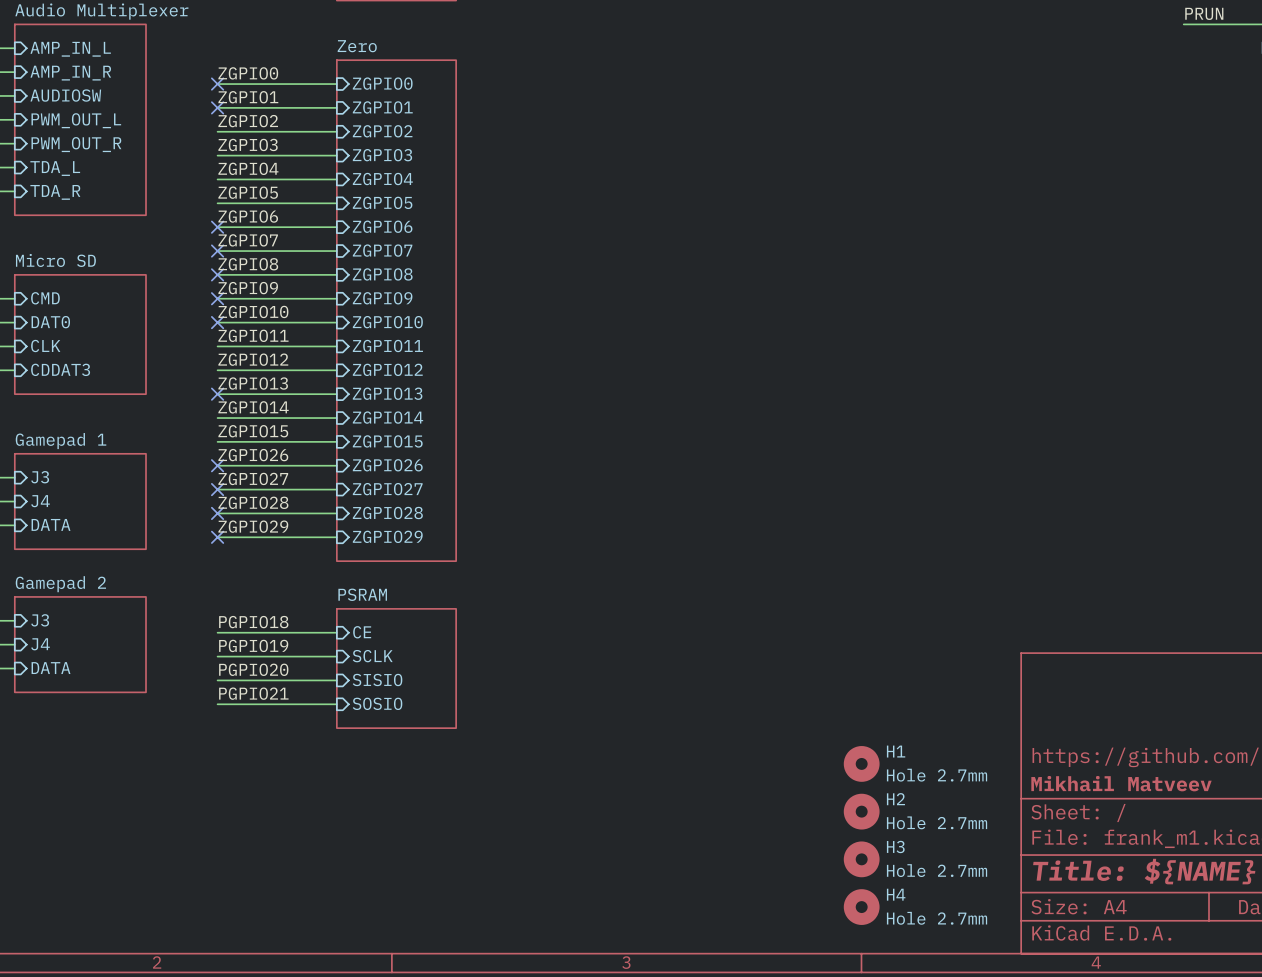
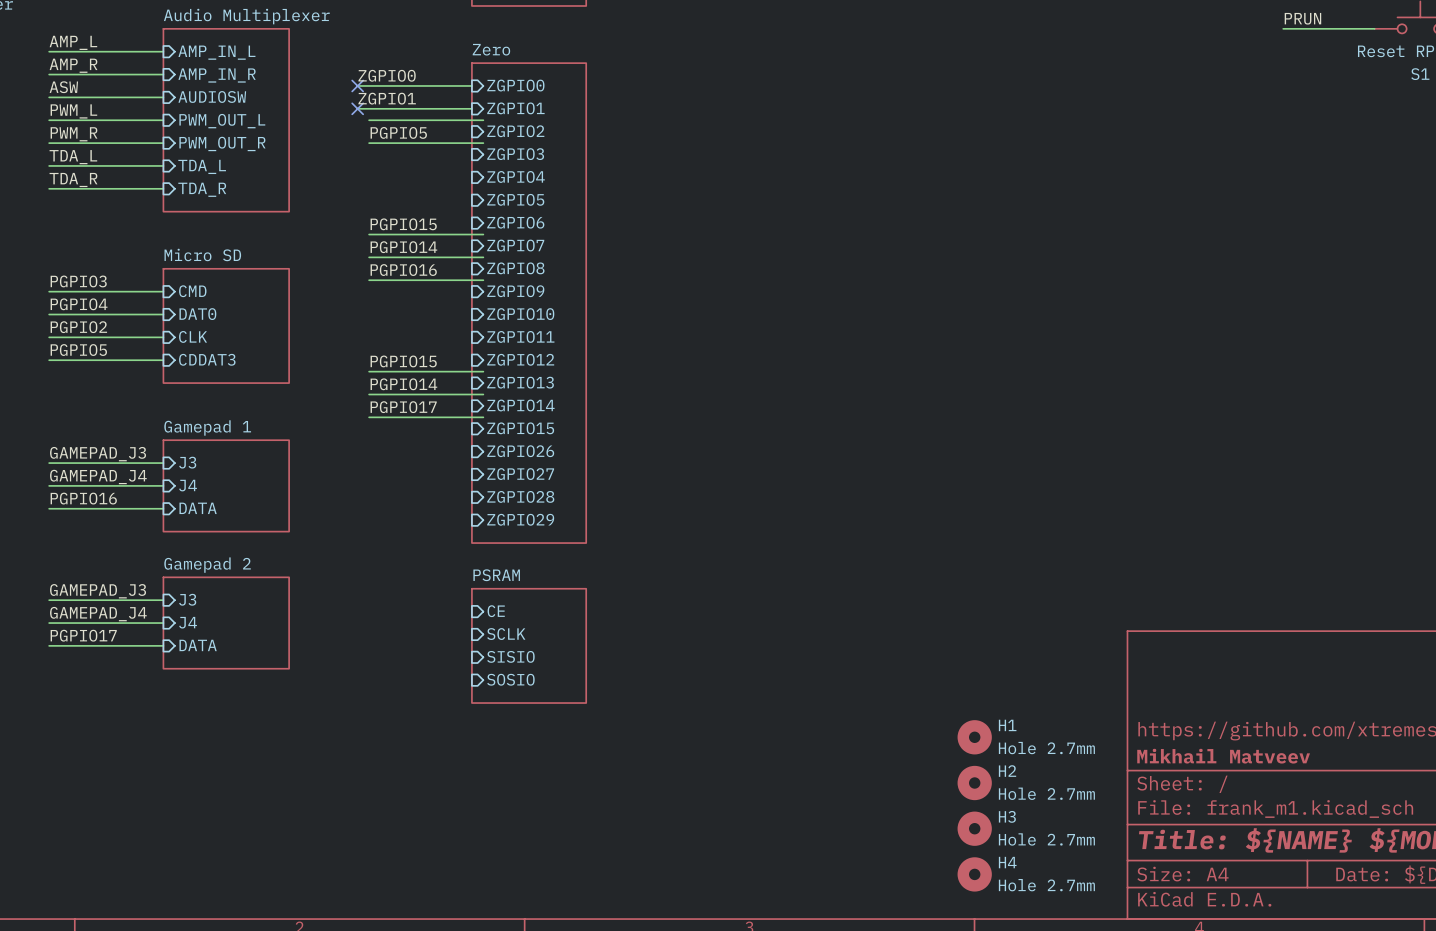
label: ZGPIO2 (248, 121) -> none
wire: (217, 131) (336, 131) -> (369, 120) (483, 120)
label: none -> PGPIO5 (398, 132)
label: ZGPIO3 (248, 144) -> none
wire: (217, 155) (336, 155) -> (369, 143) (483, 143)
label: ZGPIO4 (248, 168) -> none
wire: (217, 179) (336, 179) -> none
label: ZGPIO5 (248, 192) -> none
wire: (217, 203) (336, 203) -> none
label: ZGPIO6 (248, 216) -> none
wire: (217, 227) (336, 227) -> none
no-connect mark: (217, 227) -> none
label: none -> PGPIO15 (403, 224)
label: ZGPIO7 (248, 240) -> none
wire: (217, 251) (336, 251) -> (369, 234) (483, 234)
no-connect mark: (217, 251) -> none
label: none -> PGPIO14 (403, 247)
label: ZGPIO8 (248, 264) -> none
wire: (217, 274) (336, 274) -> (369, 257) (483, 257)
no-connect mark: (217, 274) -> none
label: none -> PGPIO16 (403, 270)
label: ZGPIO9 (248, 288) -> none
wire: (217, 298) (336, 298) -> (369, 280) (483, 280)
no-connect mark: (217, 298) -> none
label: ZGPIO10 (253, 311) -> none
wire: (217, 322) (336, 322) -> none
no-connect mark: (217, 322) -> none
label: ZGPIO11 (253, 335) -> none
wire: (217, 346) (336, 346) -> none
label: ZGPIO12 (253, 359) -> none
wire: (217, 370) (336, 370) -> none
label: none -> PGPIO15 (403, 361)
label: ZGPIO13 (253, 383) -> none
wire: (217, 394) (336, 394) -> (369, 371) (483, 371)
no-connect mark: (217, 394) -> none
label: none -> PGPIO14 (403, 384)
label: ZGPIO14 (253, 407) -> none
wire: (217, 418) (336, 418) -> (369, 394) (483, 394)
label: none -> PGPIO17 (403, 407)
label: ZGPIO15 (253, 431) -> none
wire: (217, 441) (336, 441) -> (369, 417) (483, 417)
label: ZGPIO26 (253, 455) -> none
wire: (217, 465) (336, 465) -> none
no-connect mark: (217, 465) -> none
label: ZGPIO27 (253, 478) -> none
wire: (217, 489) (336, 489) -> none
no-connect mark: (217, 489) -> none
label: ZGPIO28 (253, 502) -> none
wire: (217, 513) (336, 513) -> none
no-connect mark: (217, 513) -> none
label: ZGPIO29 (253, 526) -> none
wire: (217, 537) (336, 537) -> none
no-connect mark: (217, 537) -> none
label: PGPIO18 (253, 622) -> none
wire: (217, 632) (336, 632) -> none
label: PGPIO19 (253, 645) -> none
wire: (217, 656) (336, 656) -> none
label: PGPIO20 (253, 669) -> none
wire: (217, 680) (336, 680) -> none
label: PGPIO21 (253, 693) -> none
wire: (217, 704) (336, 704) -> none

